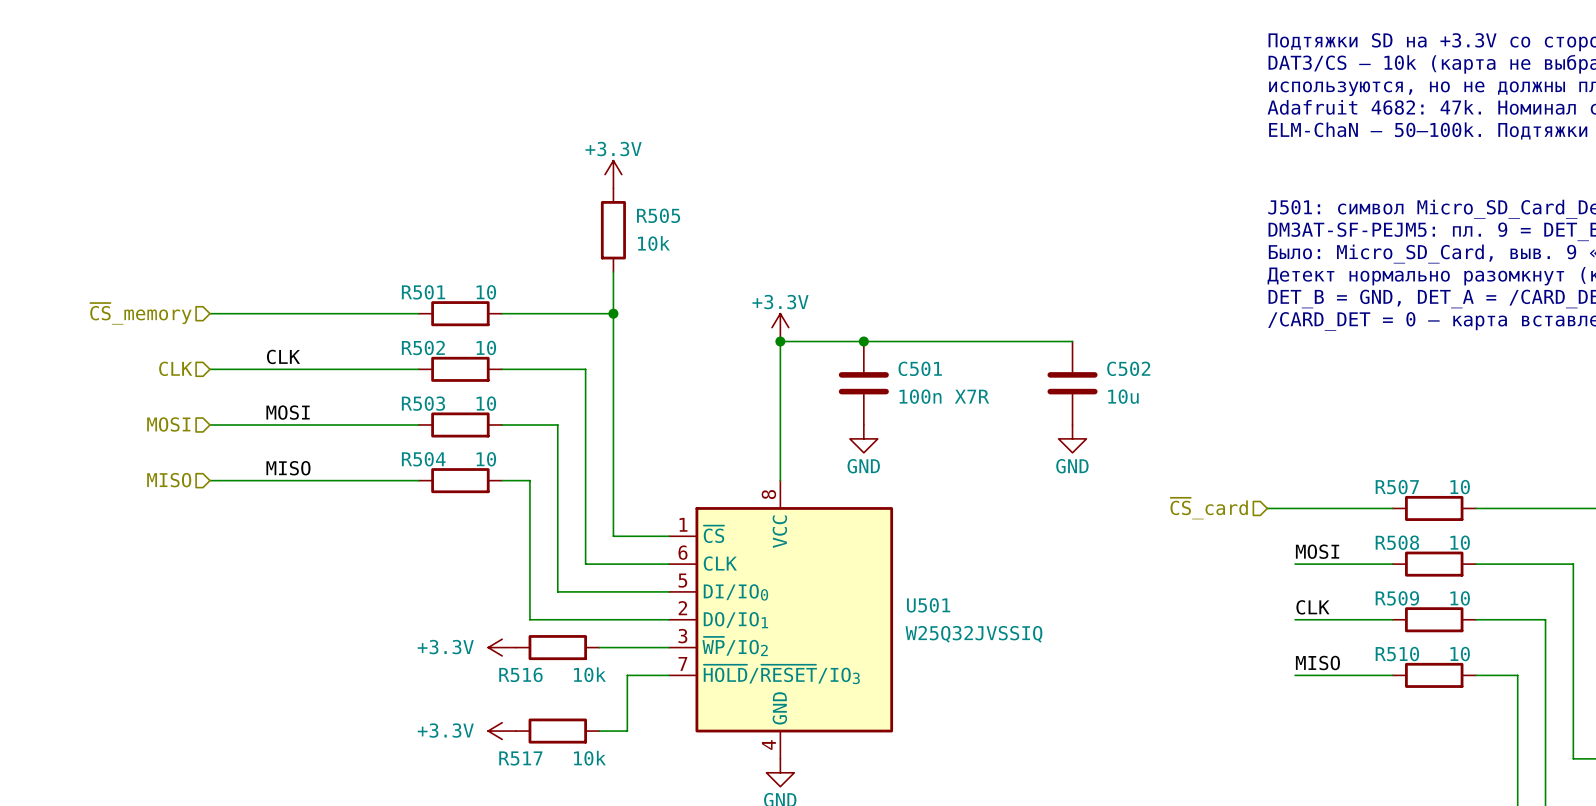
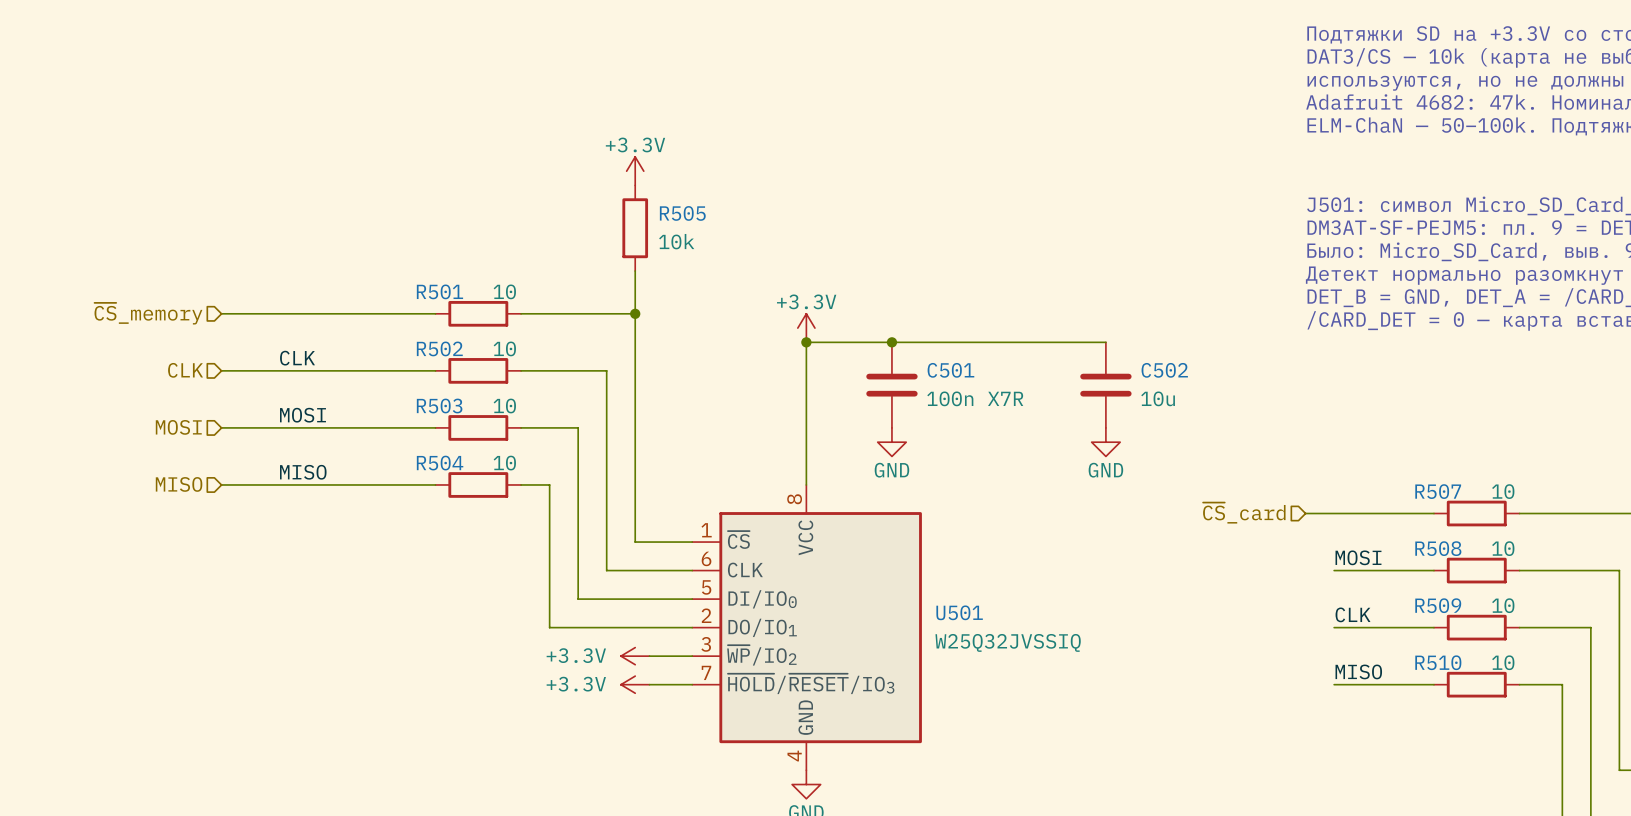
power symbol: +3.3V (502, 647) -> none
R516: 10k (557, 647) -> none
power symbol: none -> +3.3V (635, 656)
power symbol: none -> +3.3V (635, 684)
wire: (627, 675) (627, 731) (599, 731) -> none
power symbol: +3.3V (502, 731) -> none
R517: 10k (557, 731) -> none

